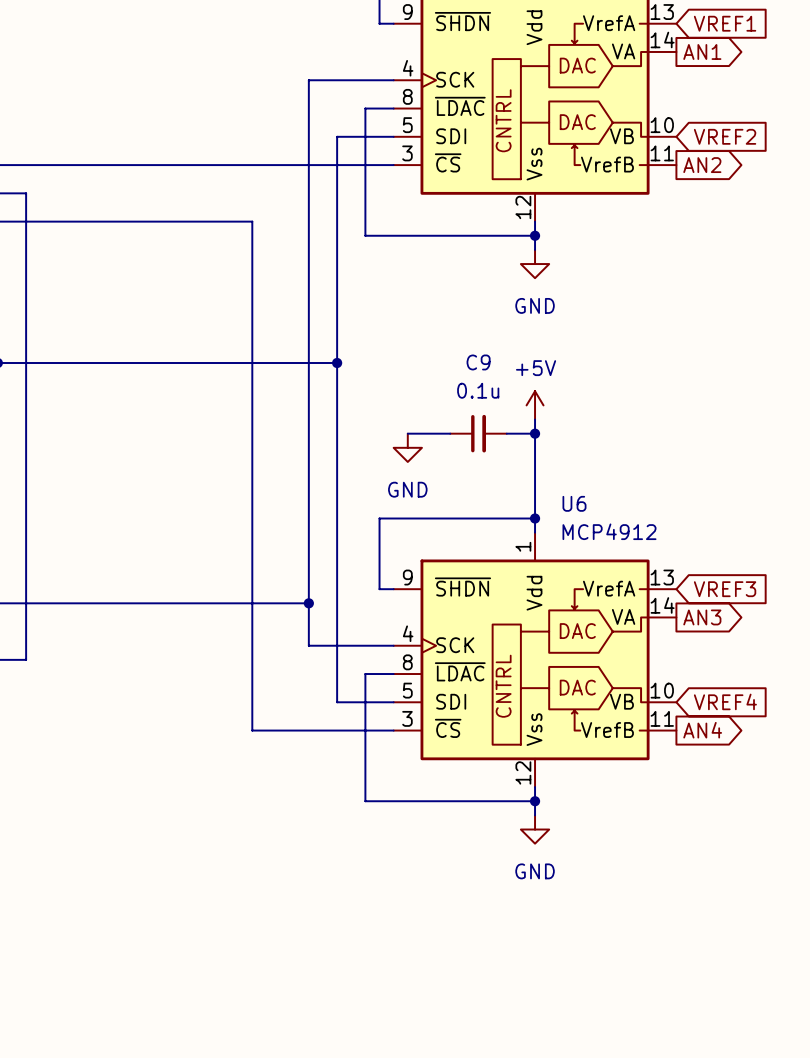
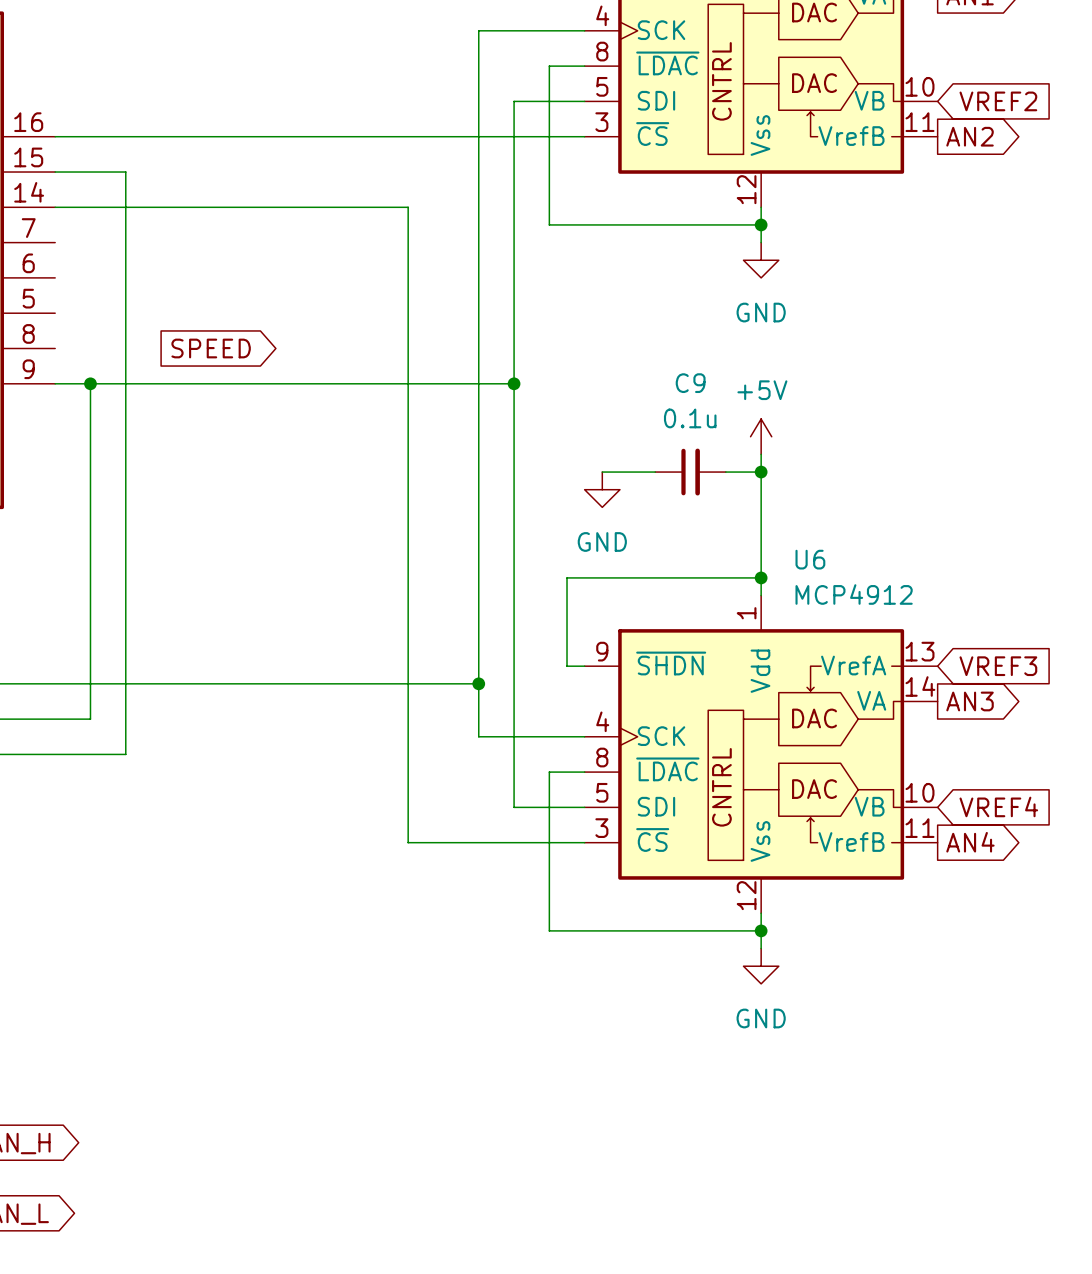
global label: none -> SPEED (211, 348)

